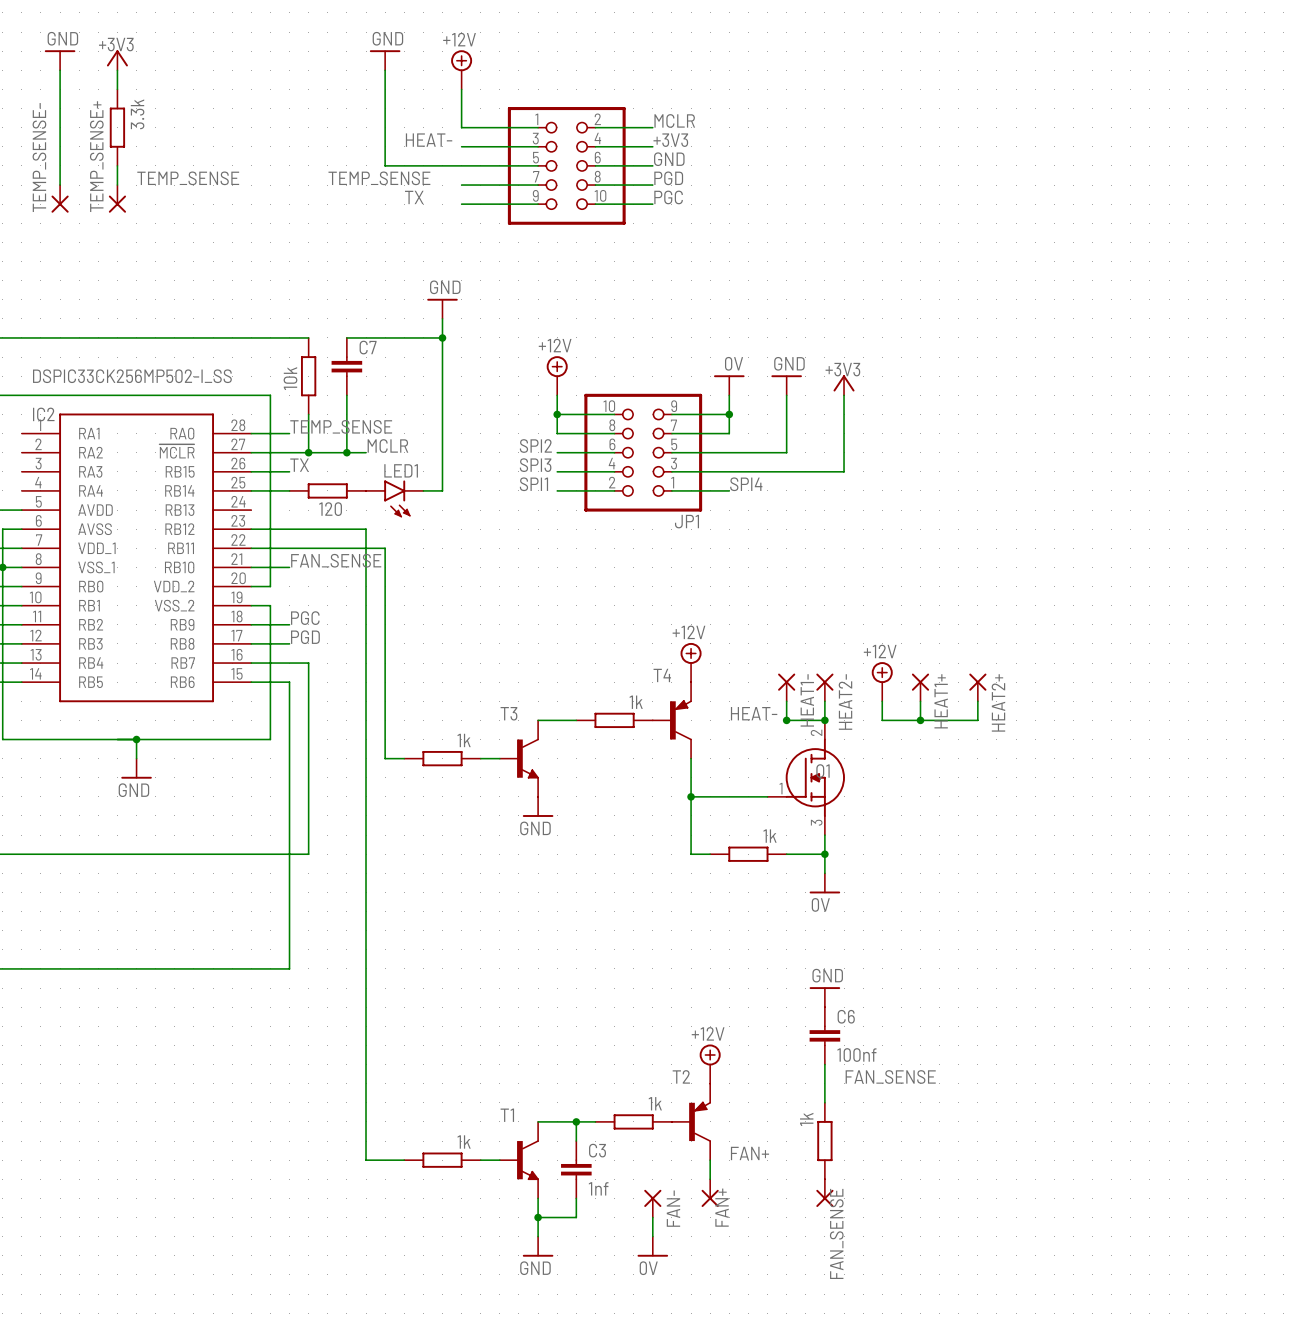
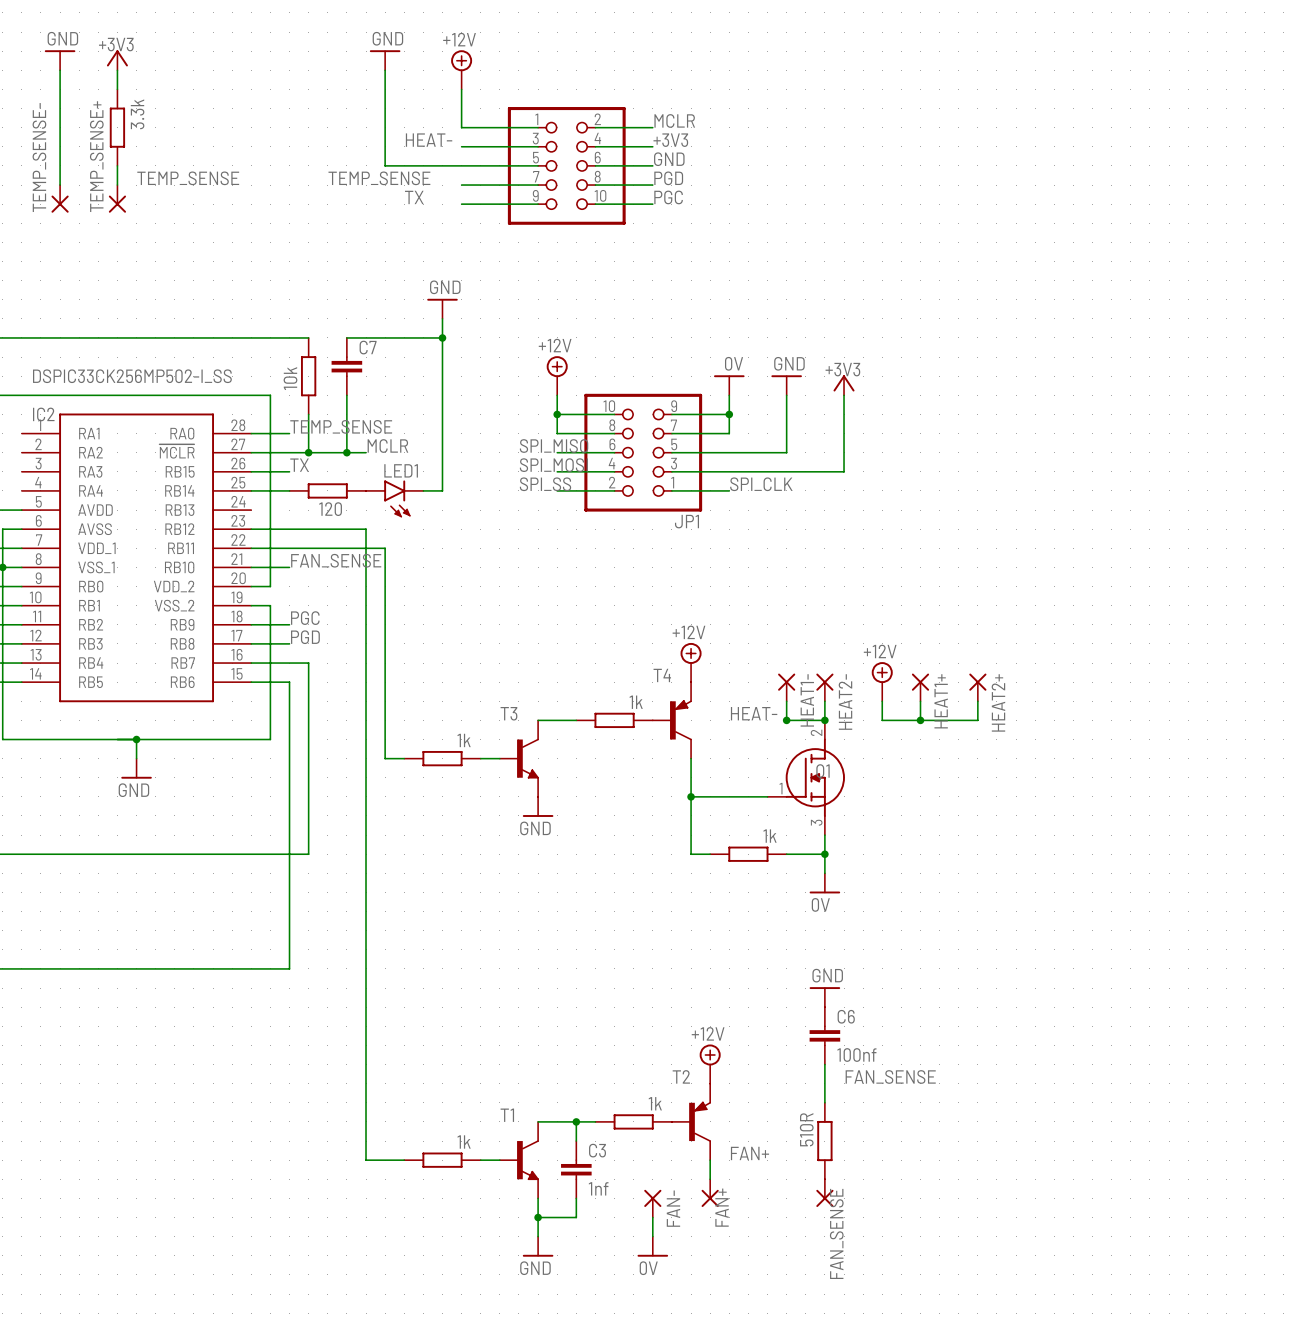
label: SPI2 (535, 446) -> SPI_MISO (554, 446)
label: SPI3 (535, 465) -> SPI_MOSI (553, 465)
label: SPI1 (533, 484) -> SPI_SS (545, 484)
label: SPI4 (746, 484) -> SPI_CLK (761, 484)
part value: 1k (806, 1119) -> 510R (806, 1129)

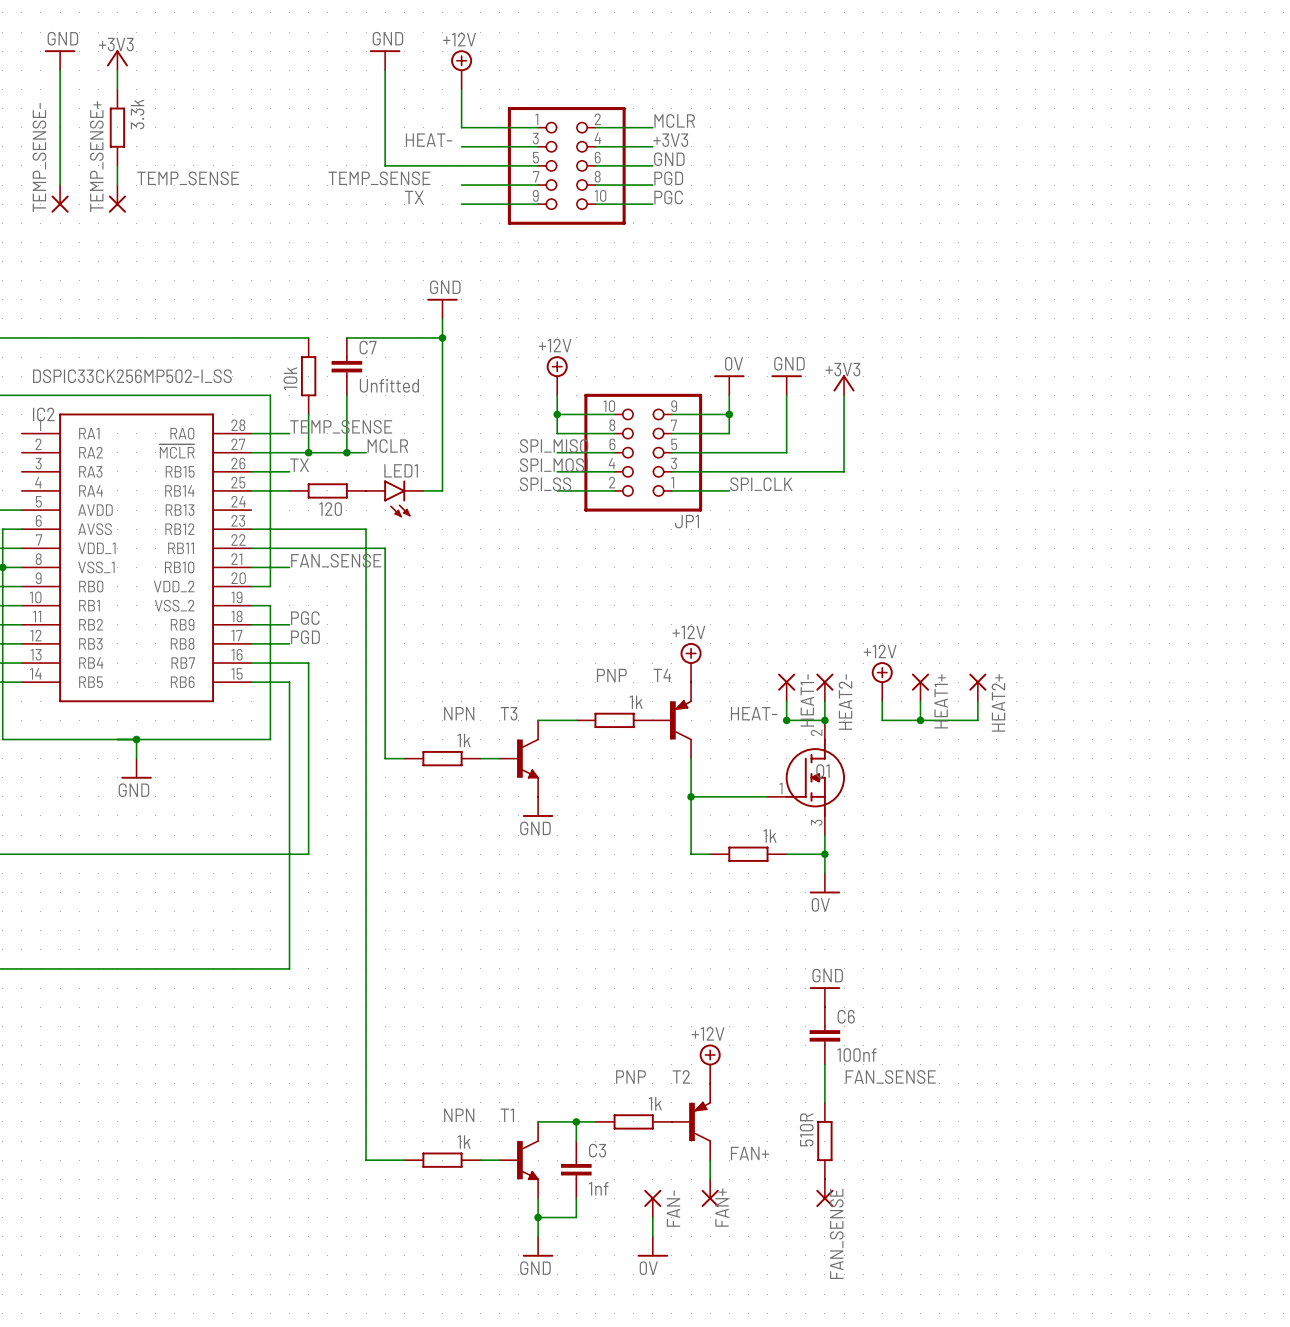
C7 value: none -> Unfitted (389, 385)
T4 value: none -> PNP (611, 675)
T3 value: none -> NPN (459, 713)
T2 value: none -> PNP (631, 1076)
T1 value: none -> NPN (459, 1115)

